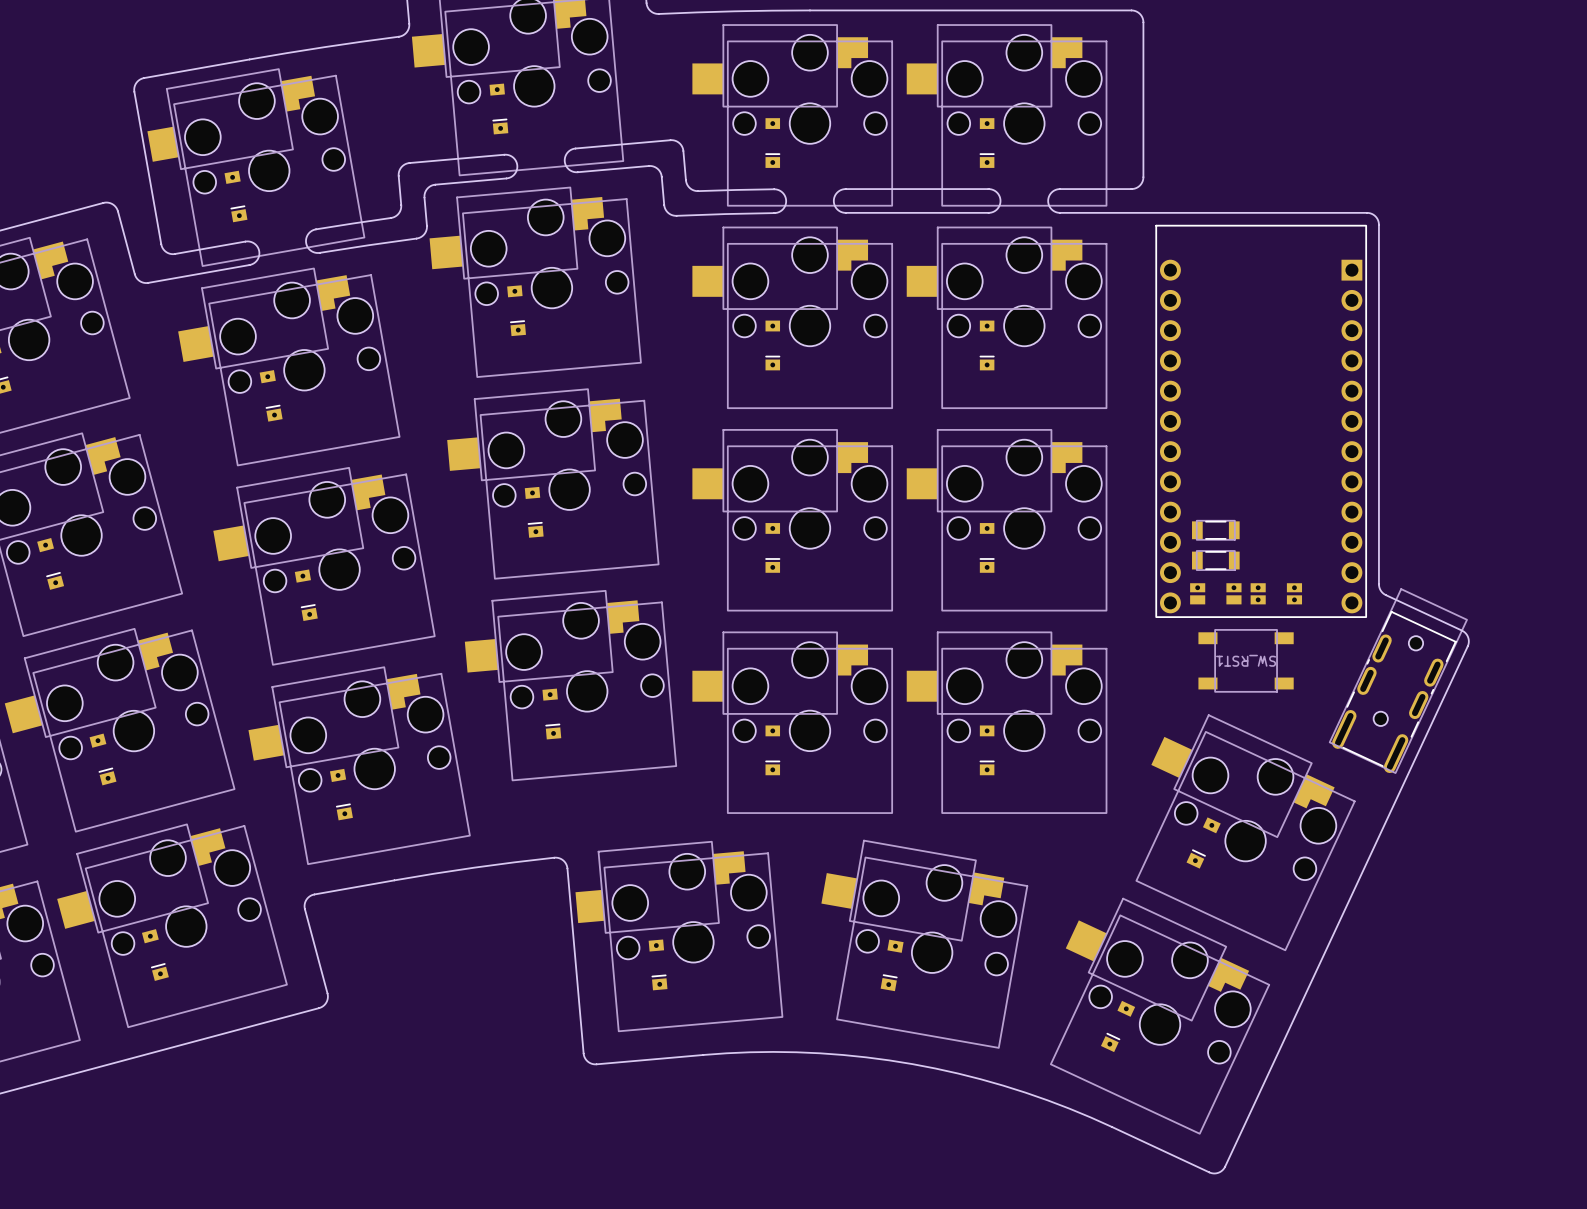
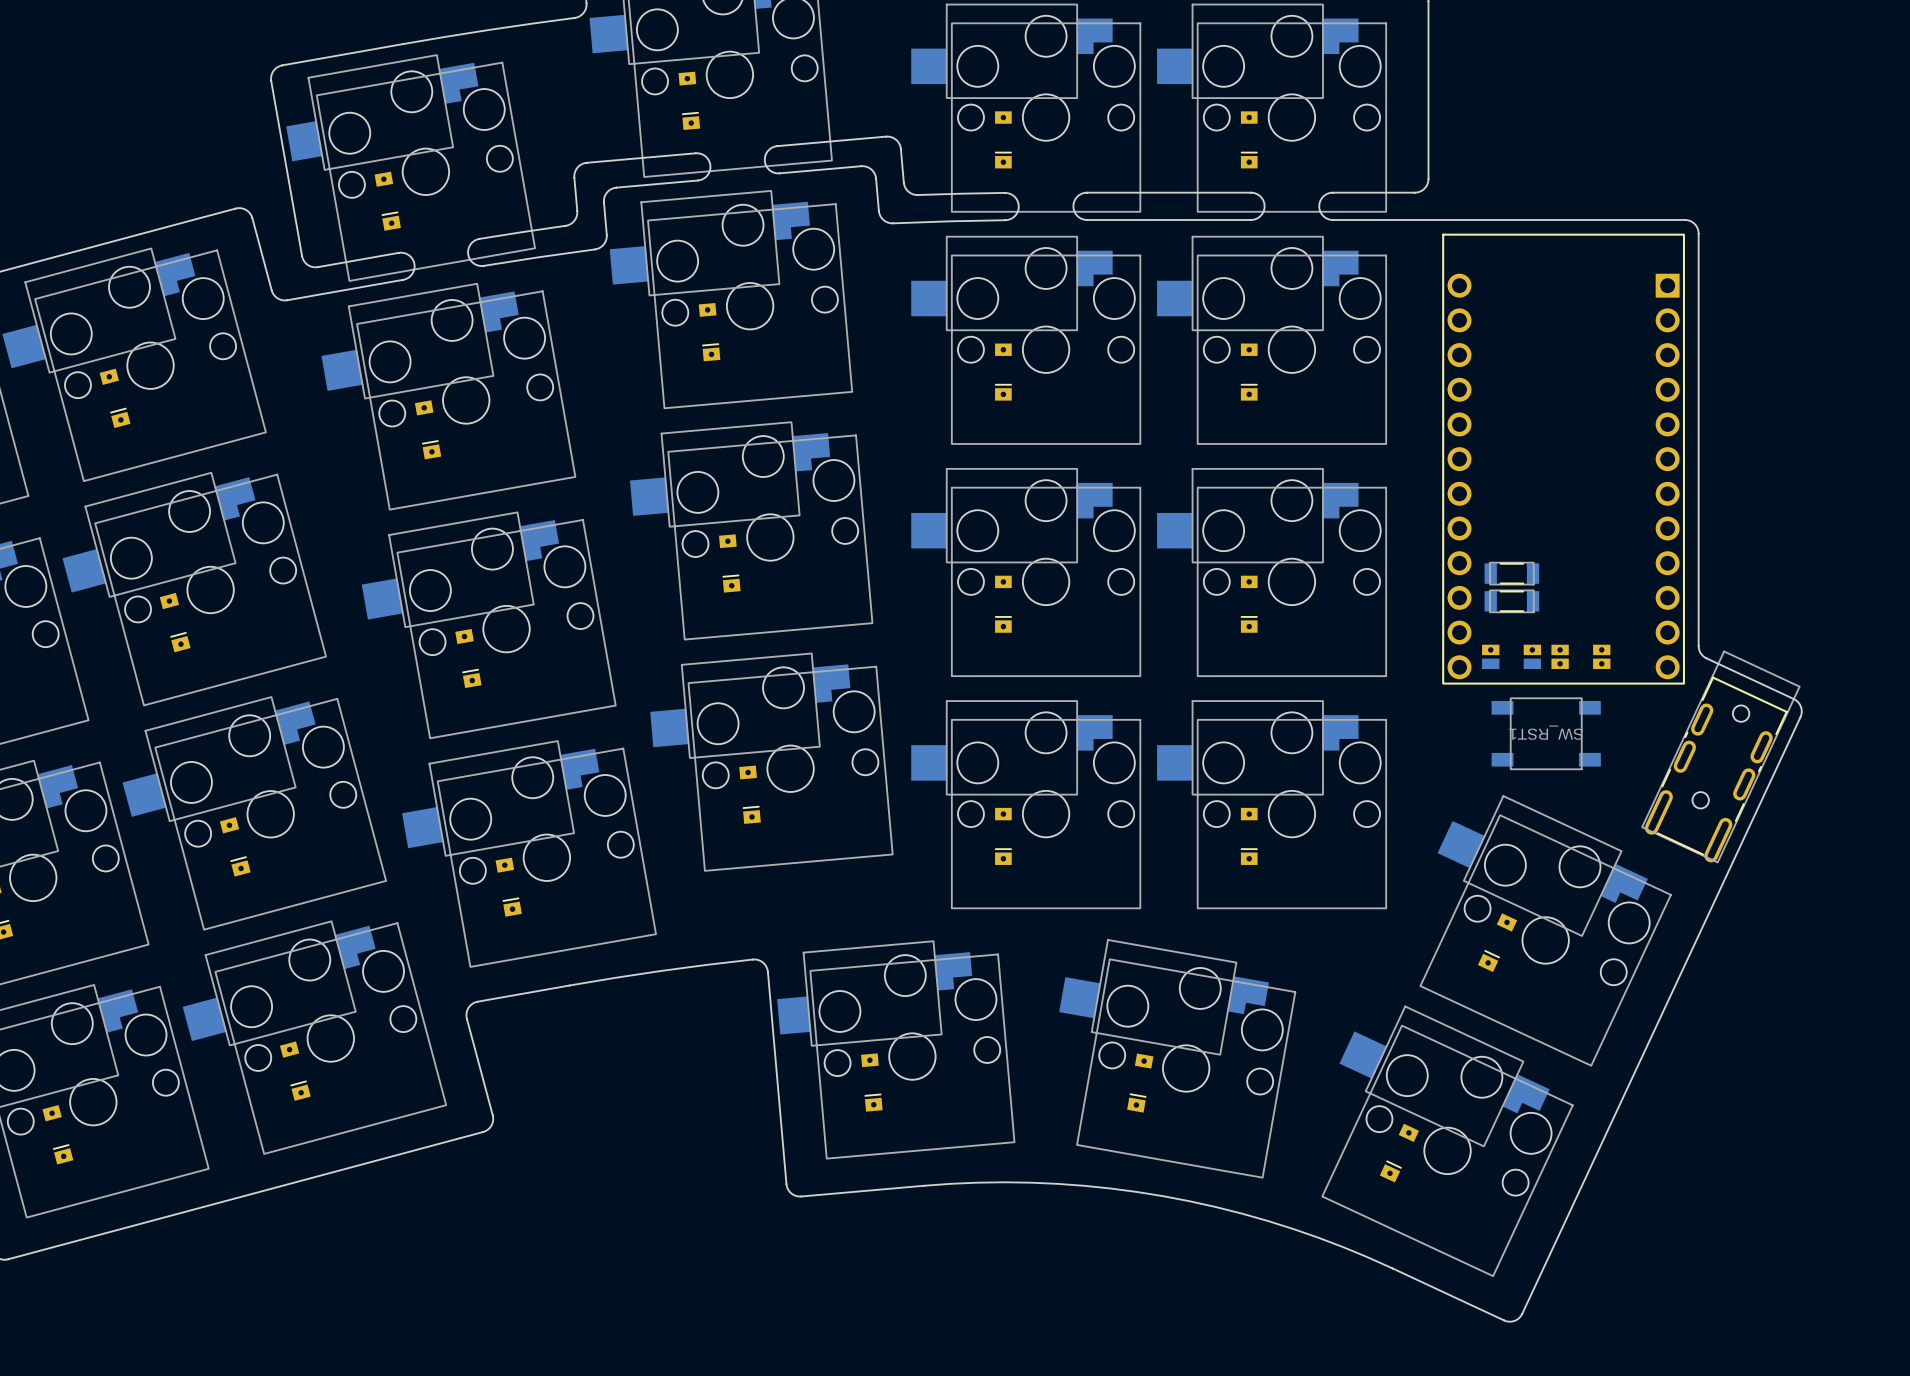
part: none -> (1511, 573)
part: (1215, 530) -> none
part: none -> (1511, 601)
part: (1215, 560) -> none

